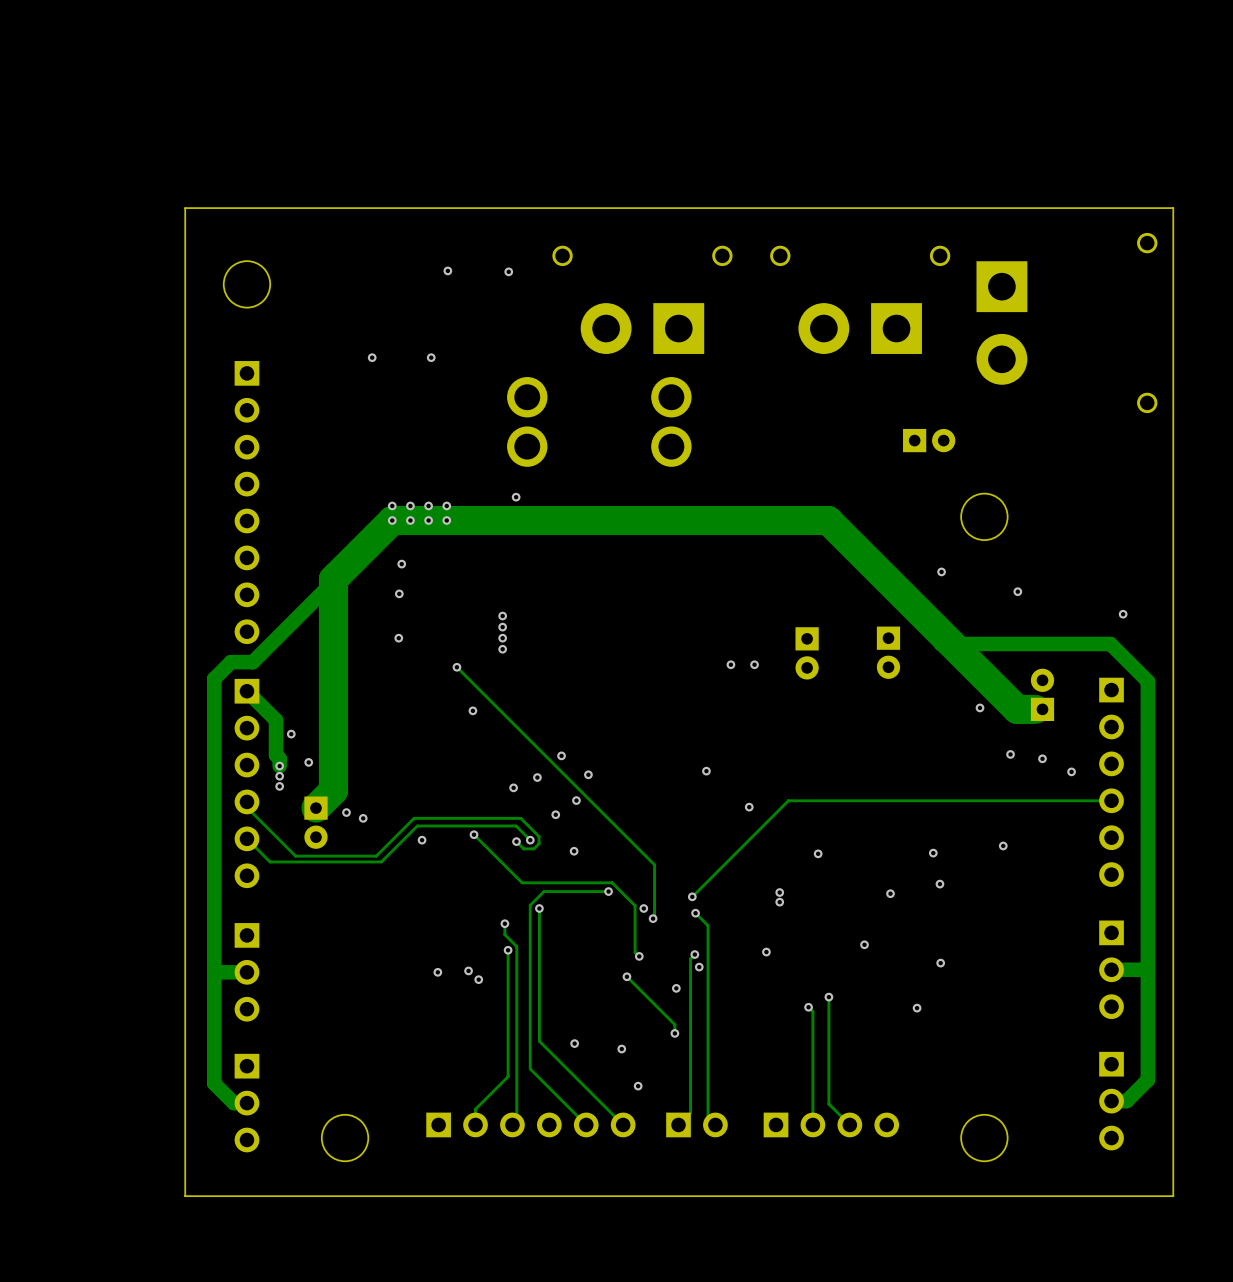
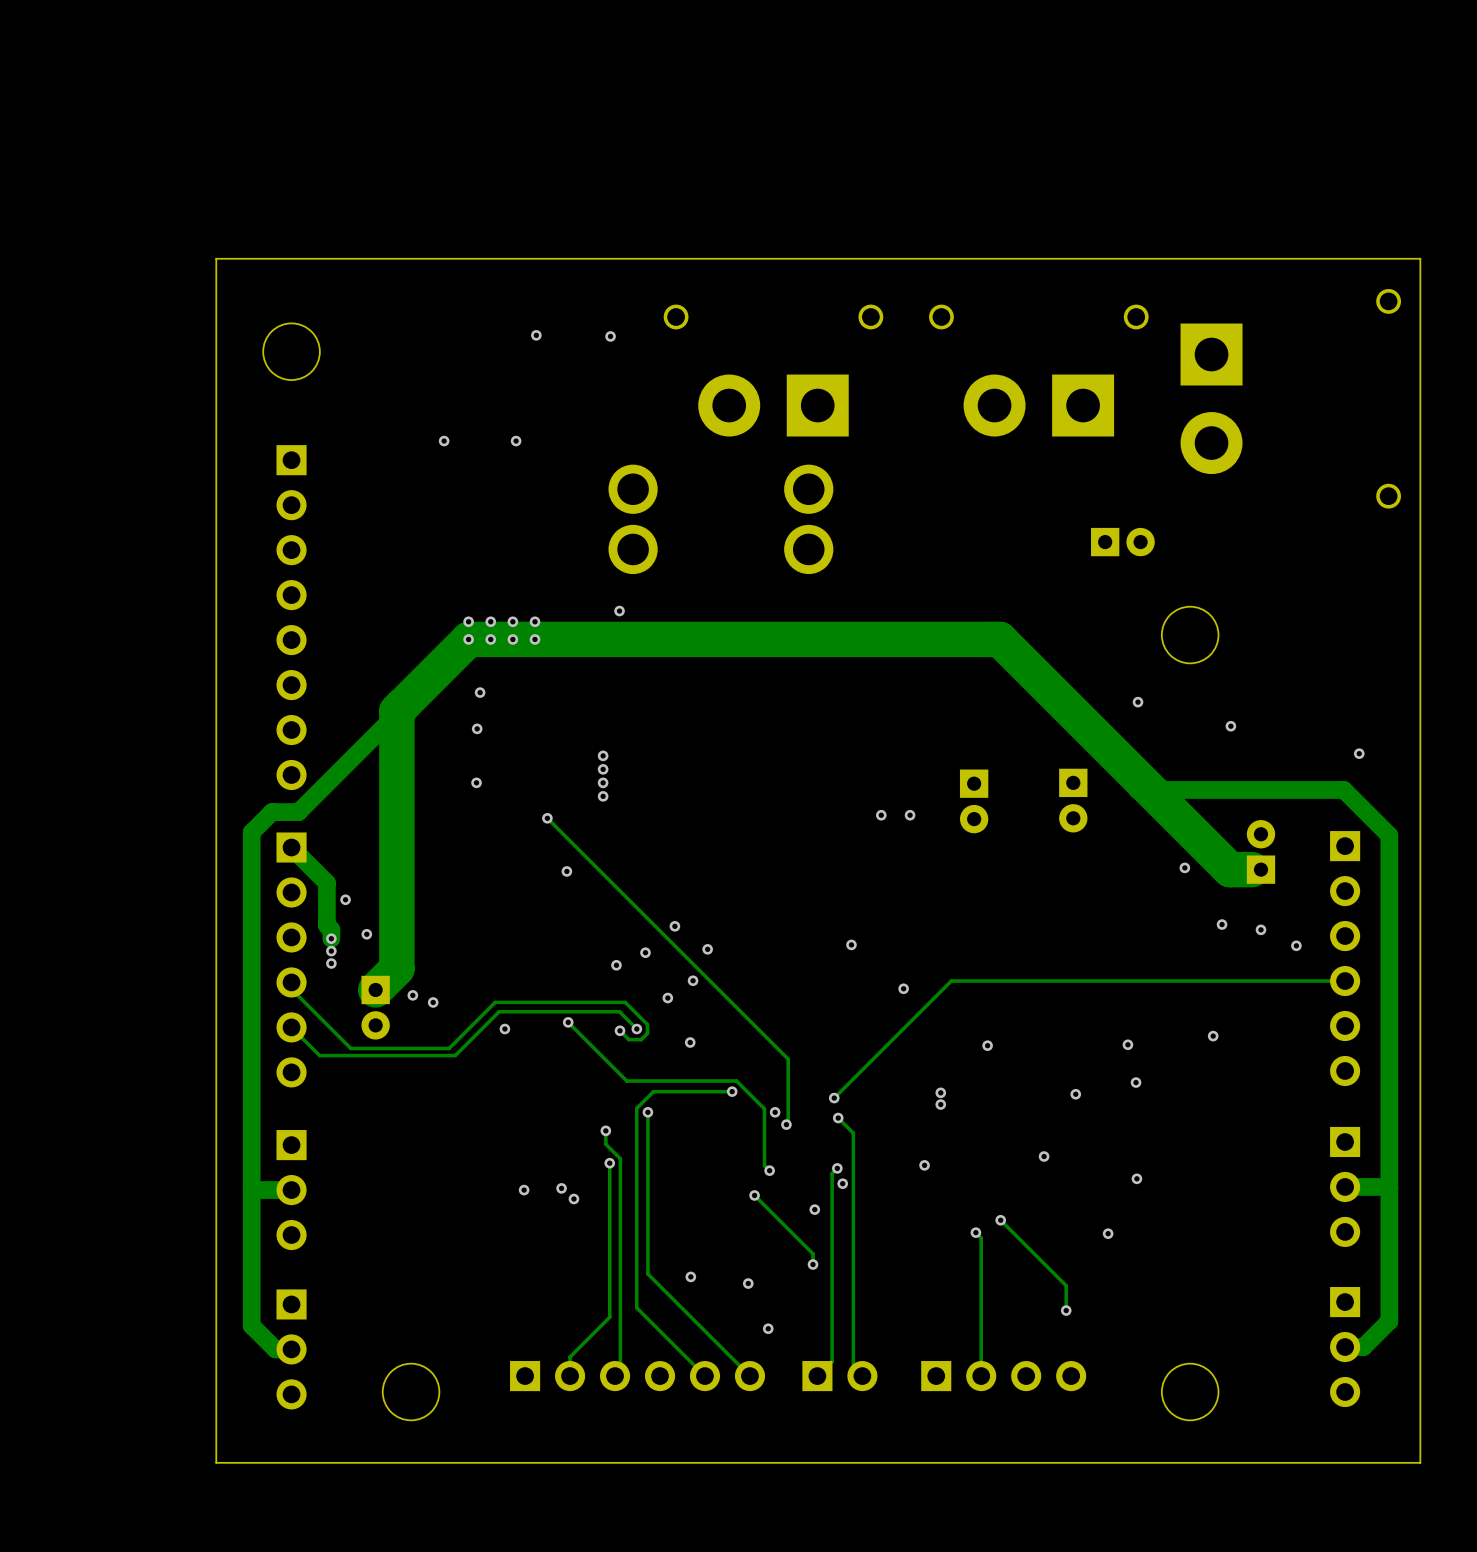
track: (828, 997) (828, 1104) (849, 1124) -> (1000, 1220) (1066, 1285) (1066, 1310)
via: none -> (1066, 1310)

